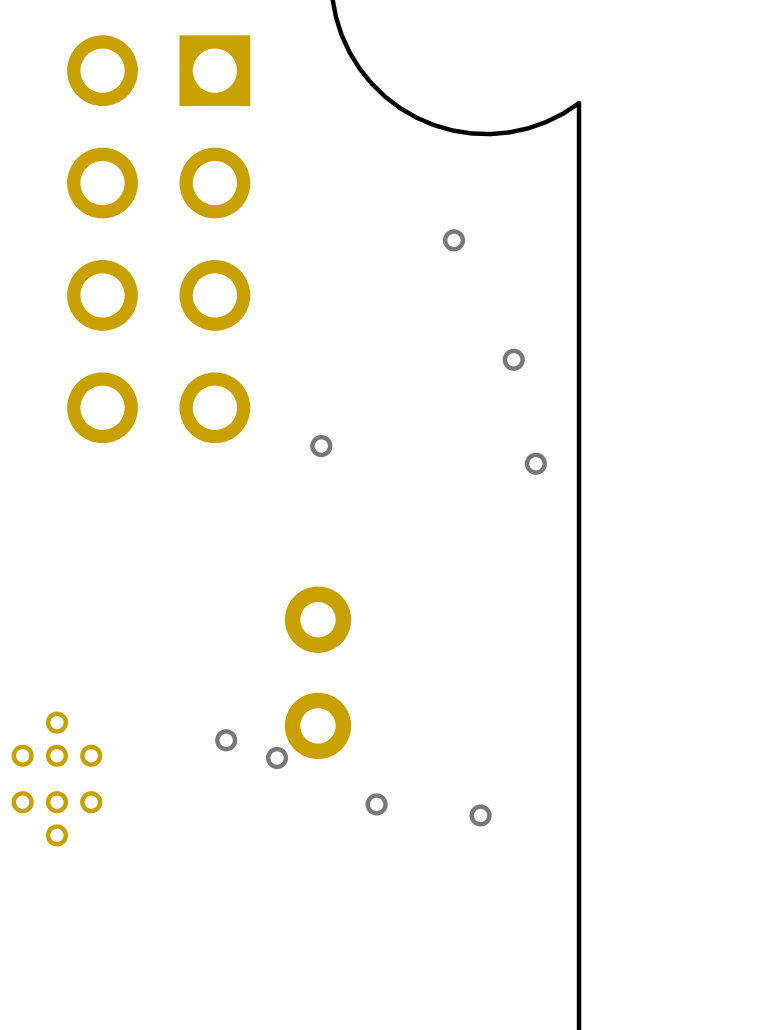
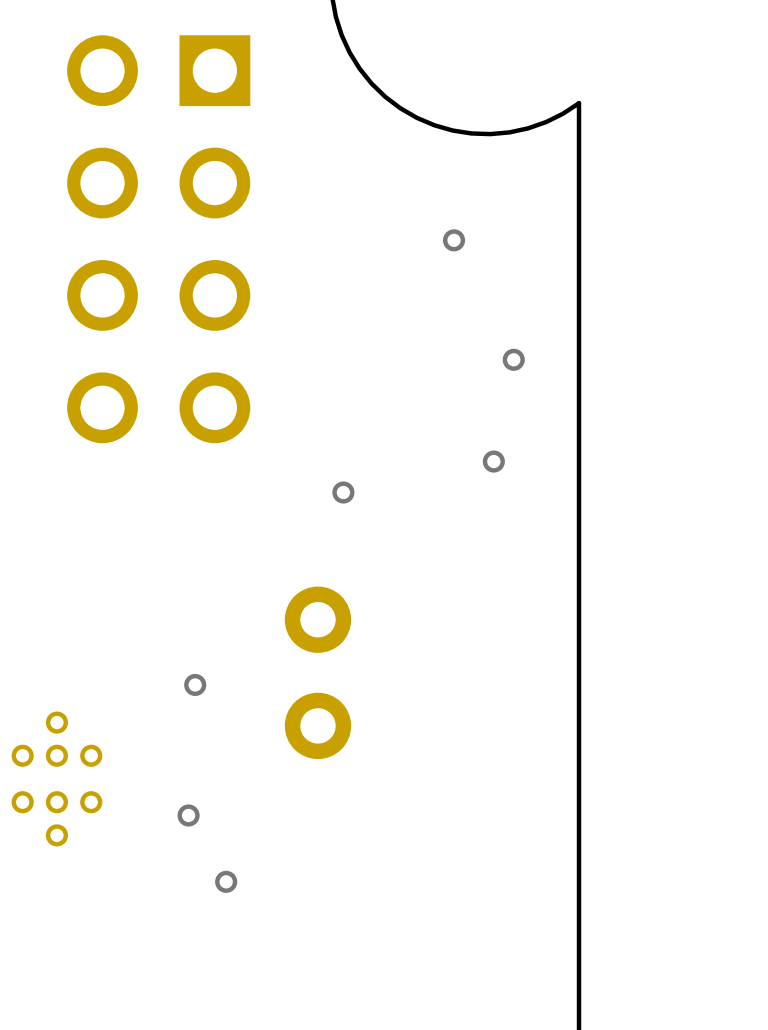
via position: (321, 446) -> (343, 492)
via position: (535, 463) -> (493, 461)
via: none -> (195, 684)
via: (226, 740) -> none
via: (277, 757) -> none
via: (376, 804) -> none
via: none -> (188, 815)
via: (480, 815) -> none
via: none -> (226, 881)

